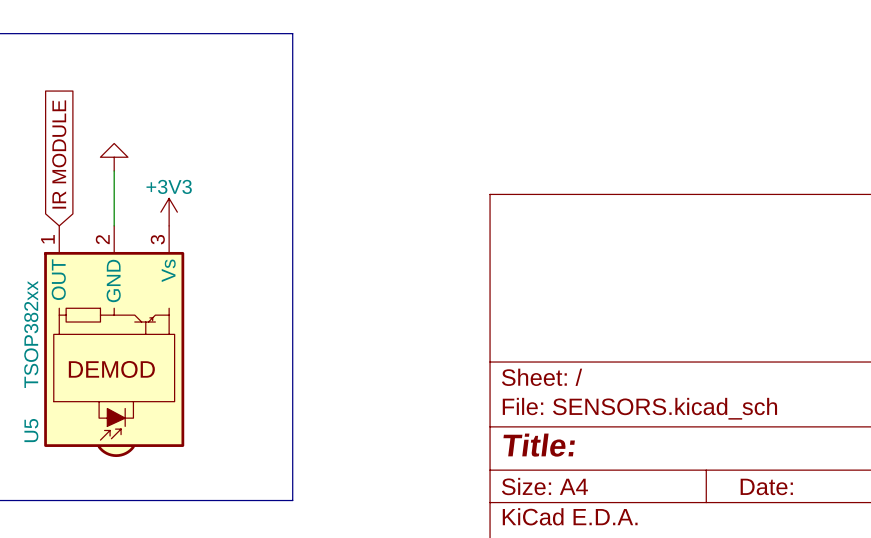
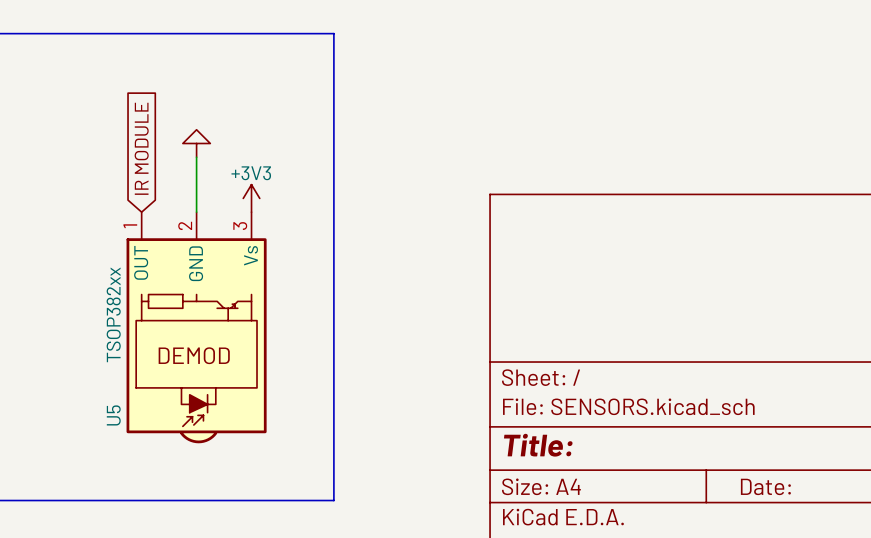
line: (292, 33) (292, 500) -> (292, 33) (333, 33) (333, 500) (292, 500)
global label position: IR MODULE (59, 154) -> IR MODULE (141, 148)
power symbol position: (114, 157) -> (196, 143)
wire: (114, 170) (114, 225) -> (196, 157) (196, 212)
power symbol position: +3V3 (169, 212) -> +3V3 (251, 198)
U5 position: (114, 341) -> (196, 327)

